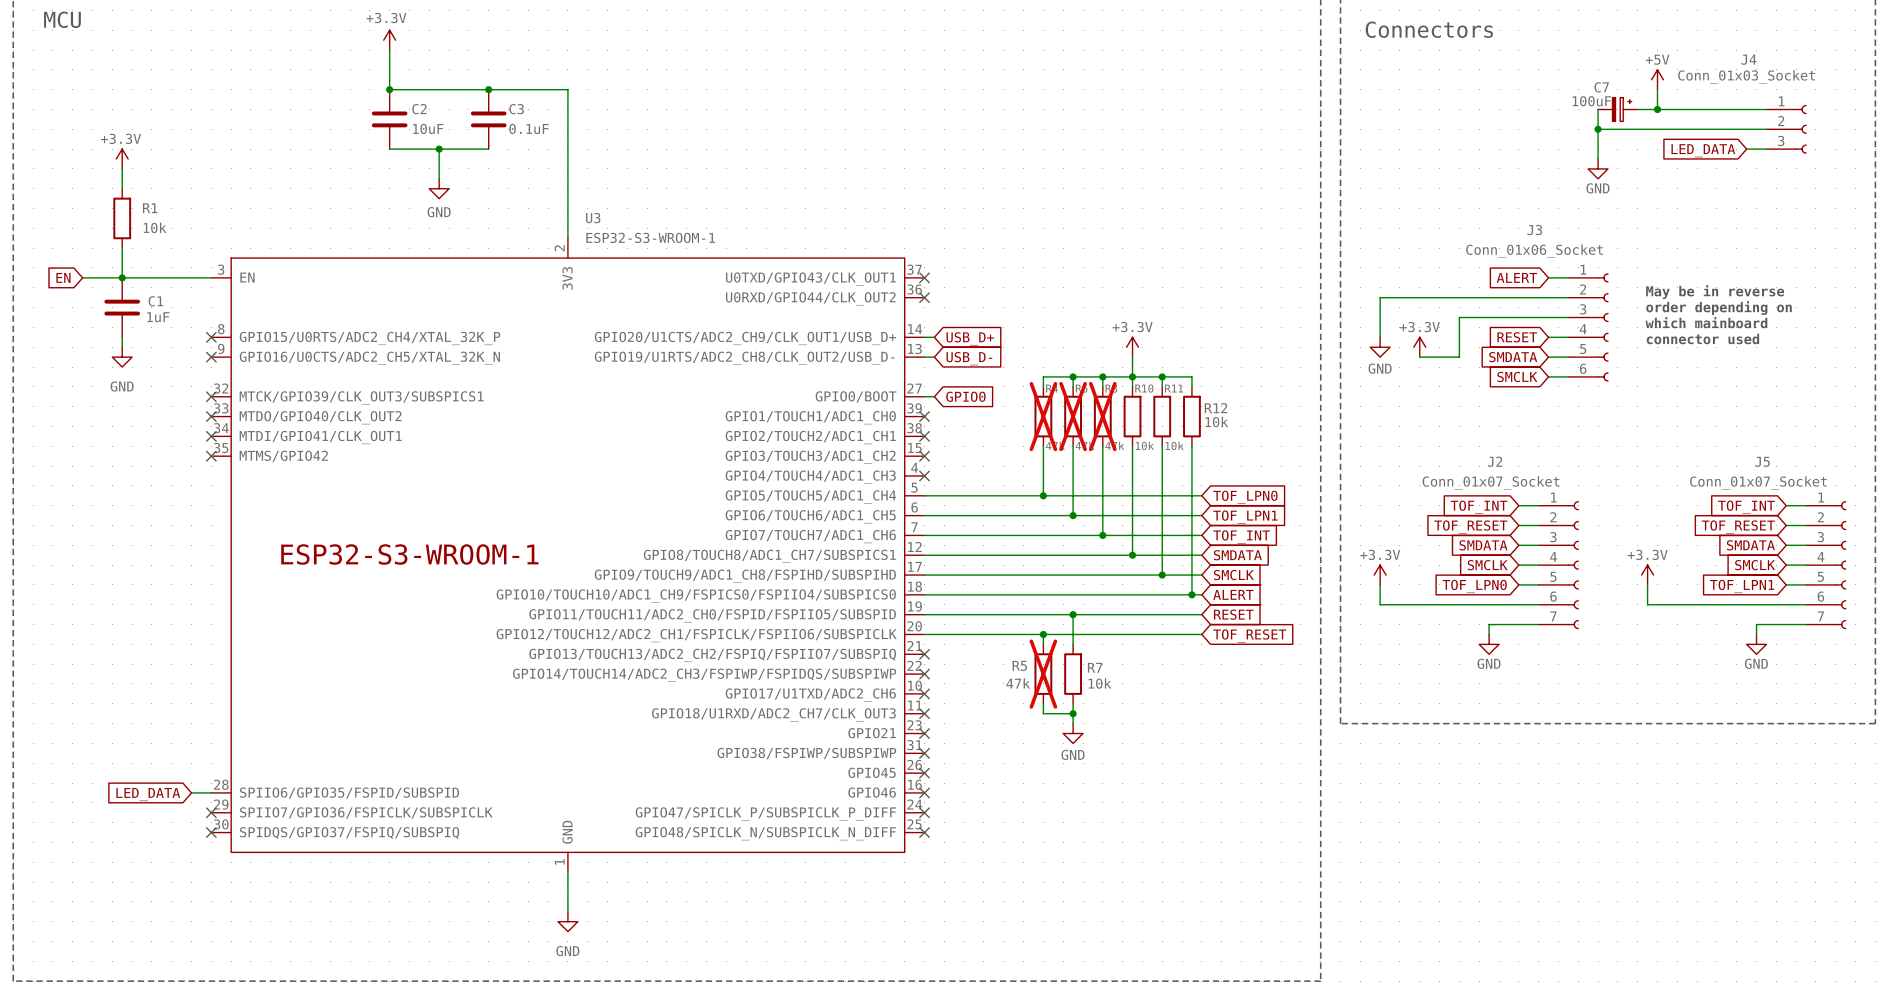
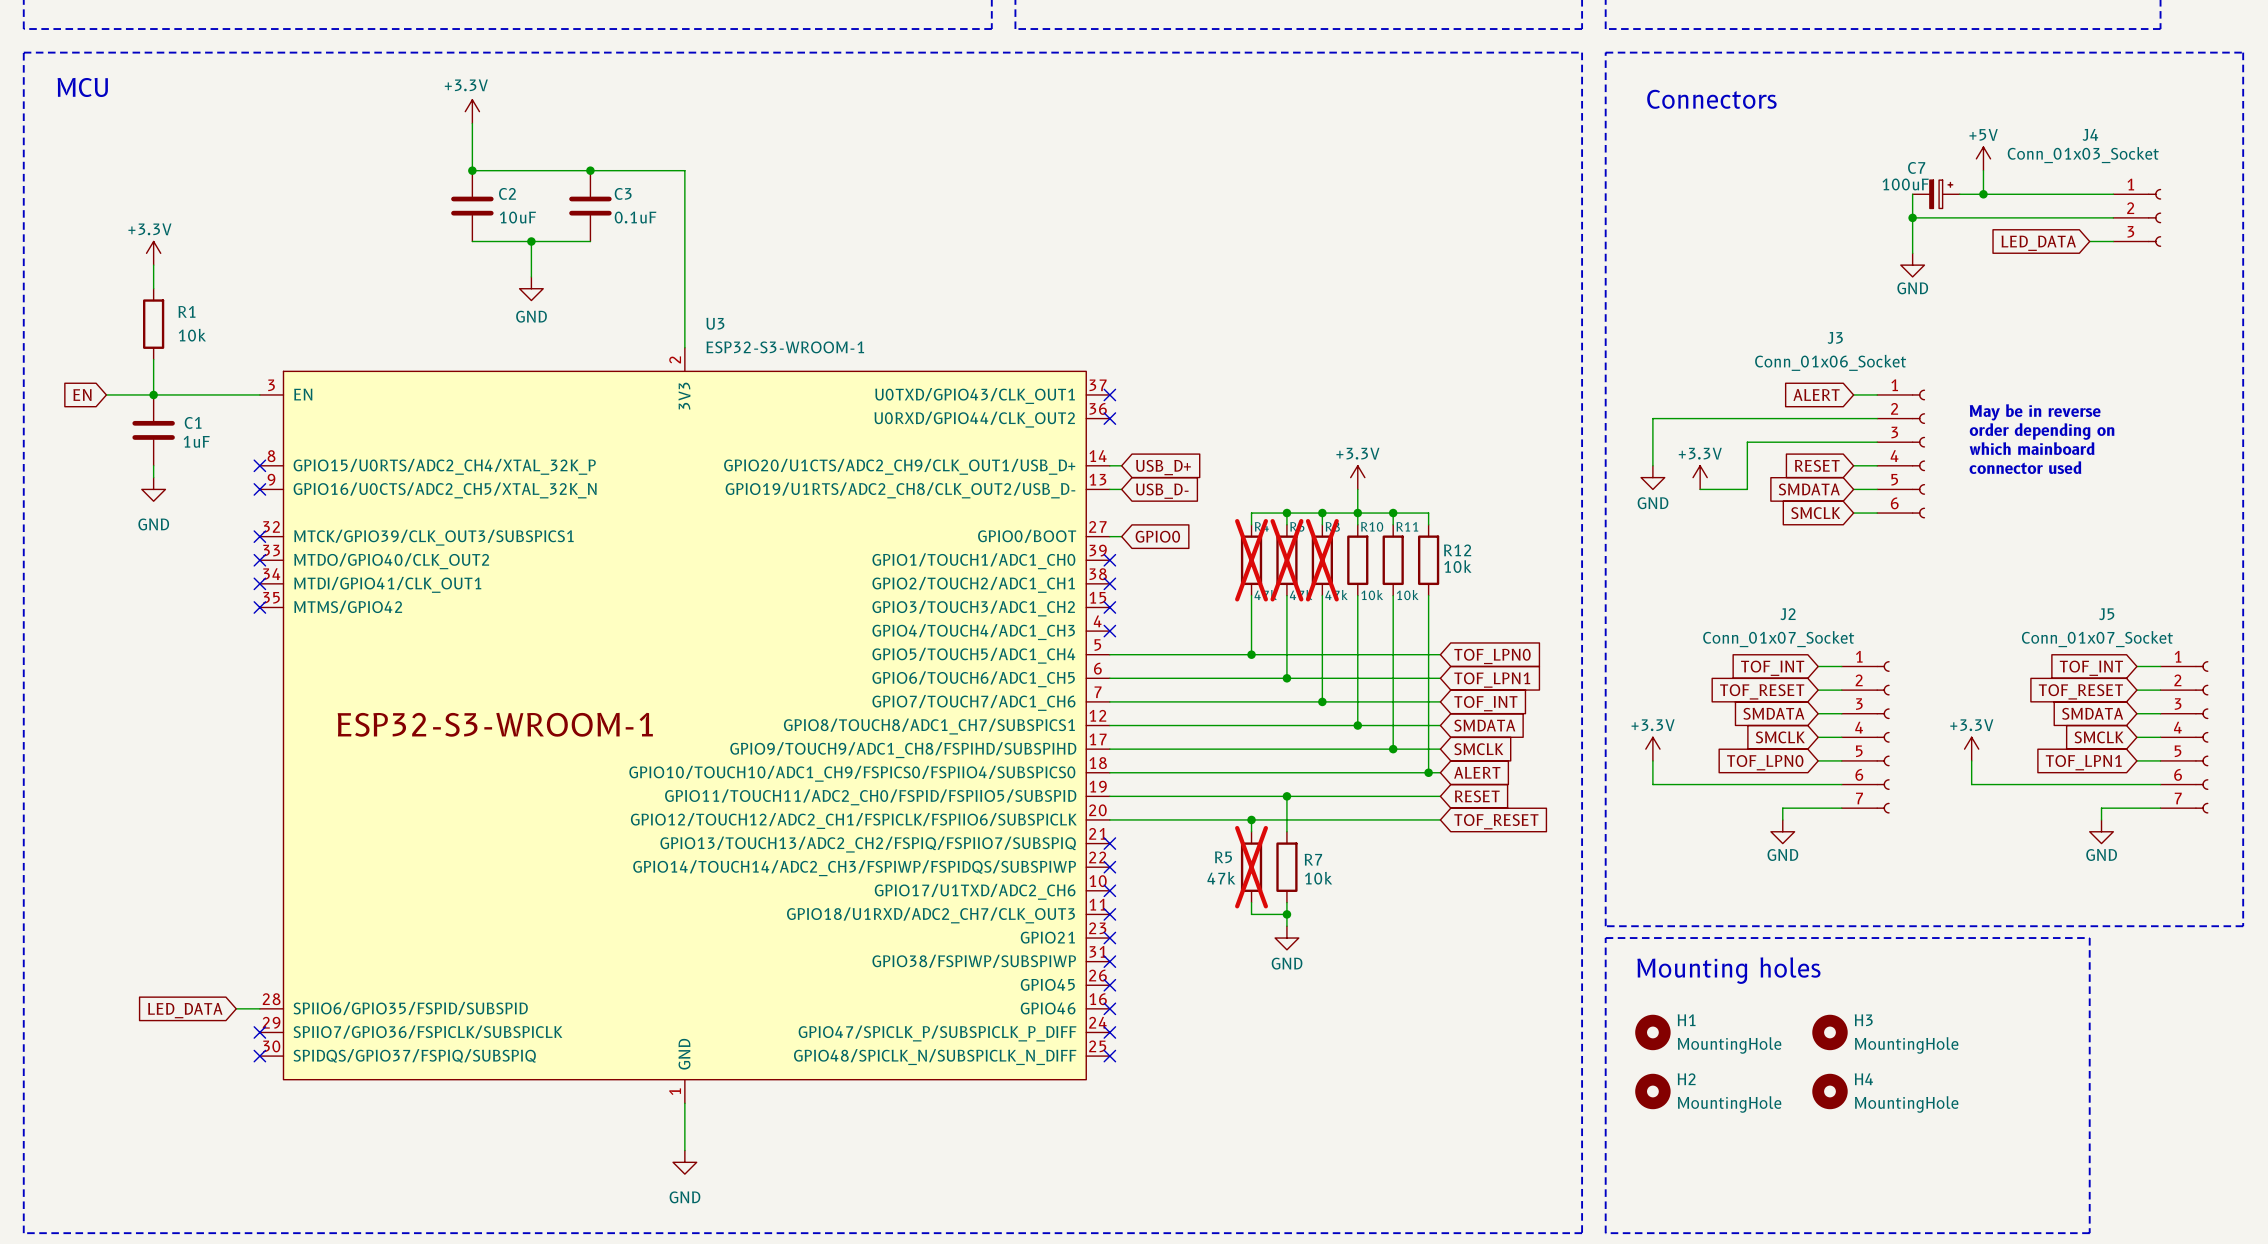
line: none -> (1605, 938) (2089, 938) (2089, 1233) (1605, 1233) (1605, 938)
text: none -> Mounting holes (1728, 970)
H1: none -> MountingHole (1652, 1032)
H3: none -> MountingHole (1829, 1032)
H2: none -> MountingHole (1652, 1091)
H4: none -> MountingHole (1829, 1091)

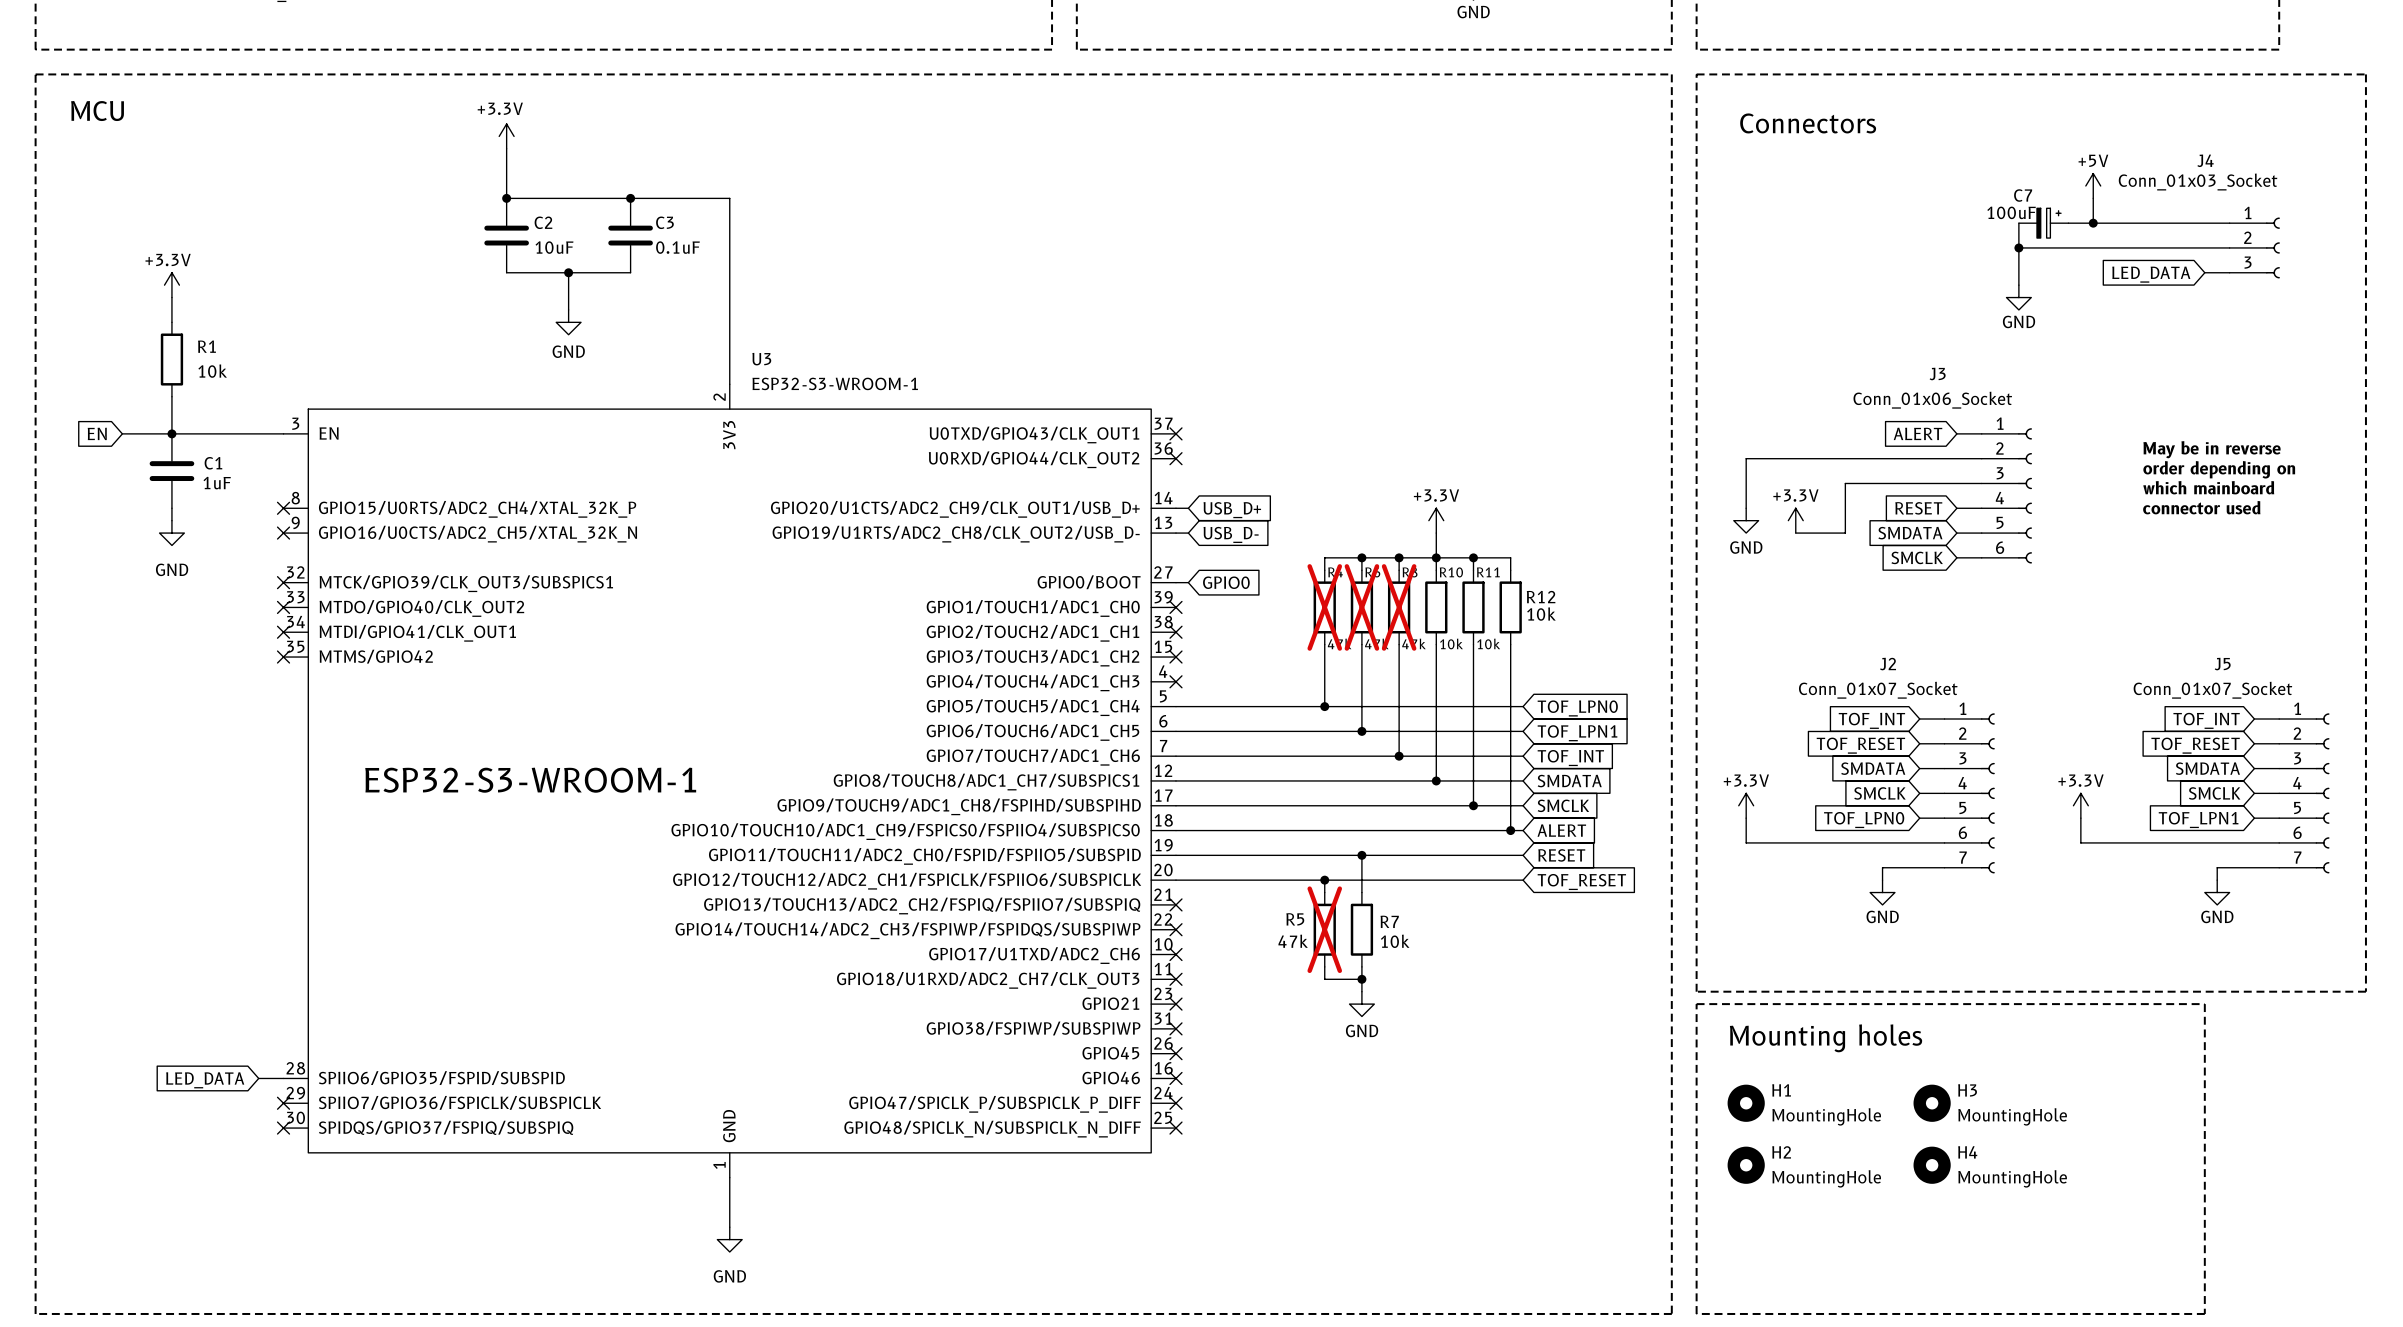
text position: May be in reverse (2035, 412) -> May be in reverse (2212, 449)
text position: order depending on (2042, 431) -> order depending on (2219, 469)
text position: which mainboard (2032, 448) -> which mainboard (2208, 487)
text position: connector used (2025, 467) -> connector used (2201, 507)

